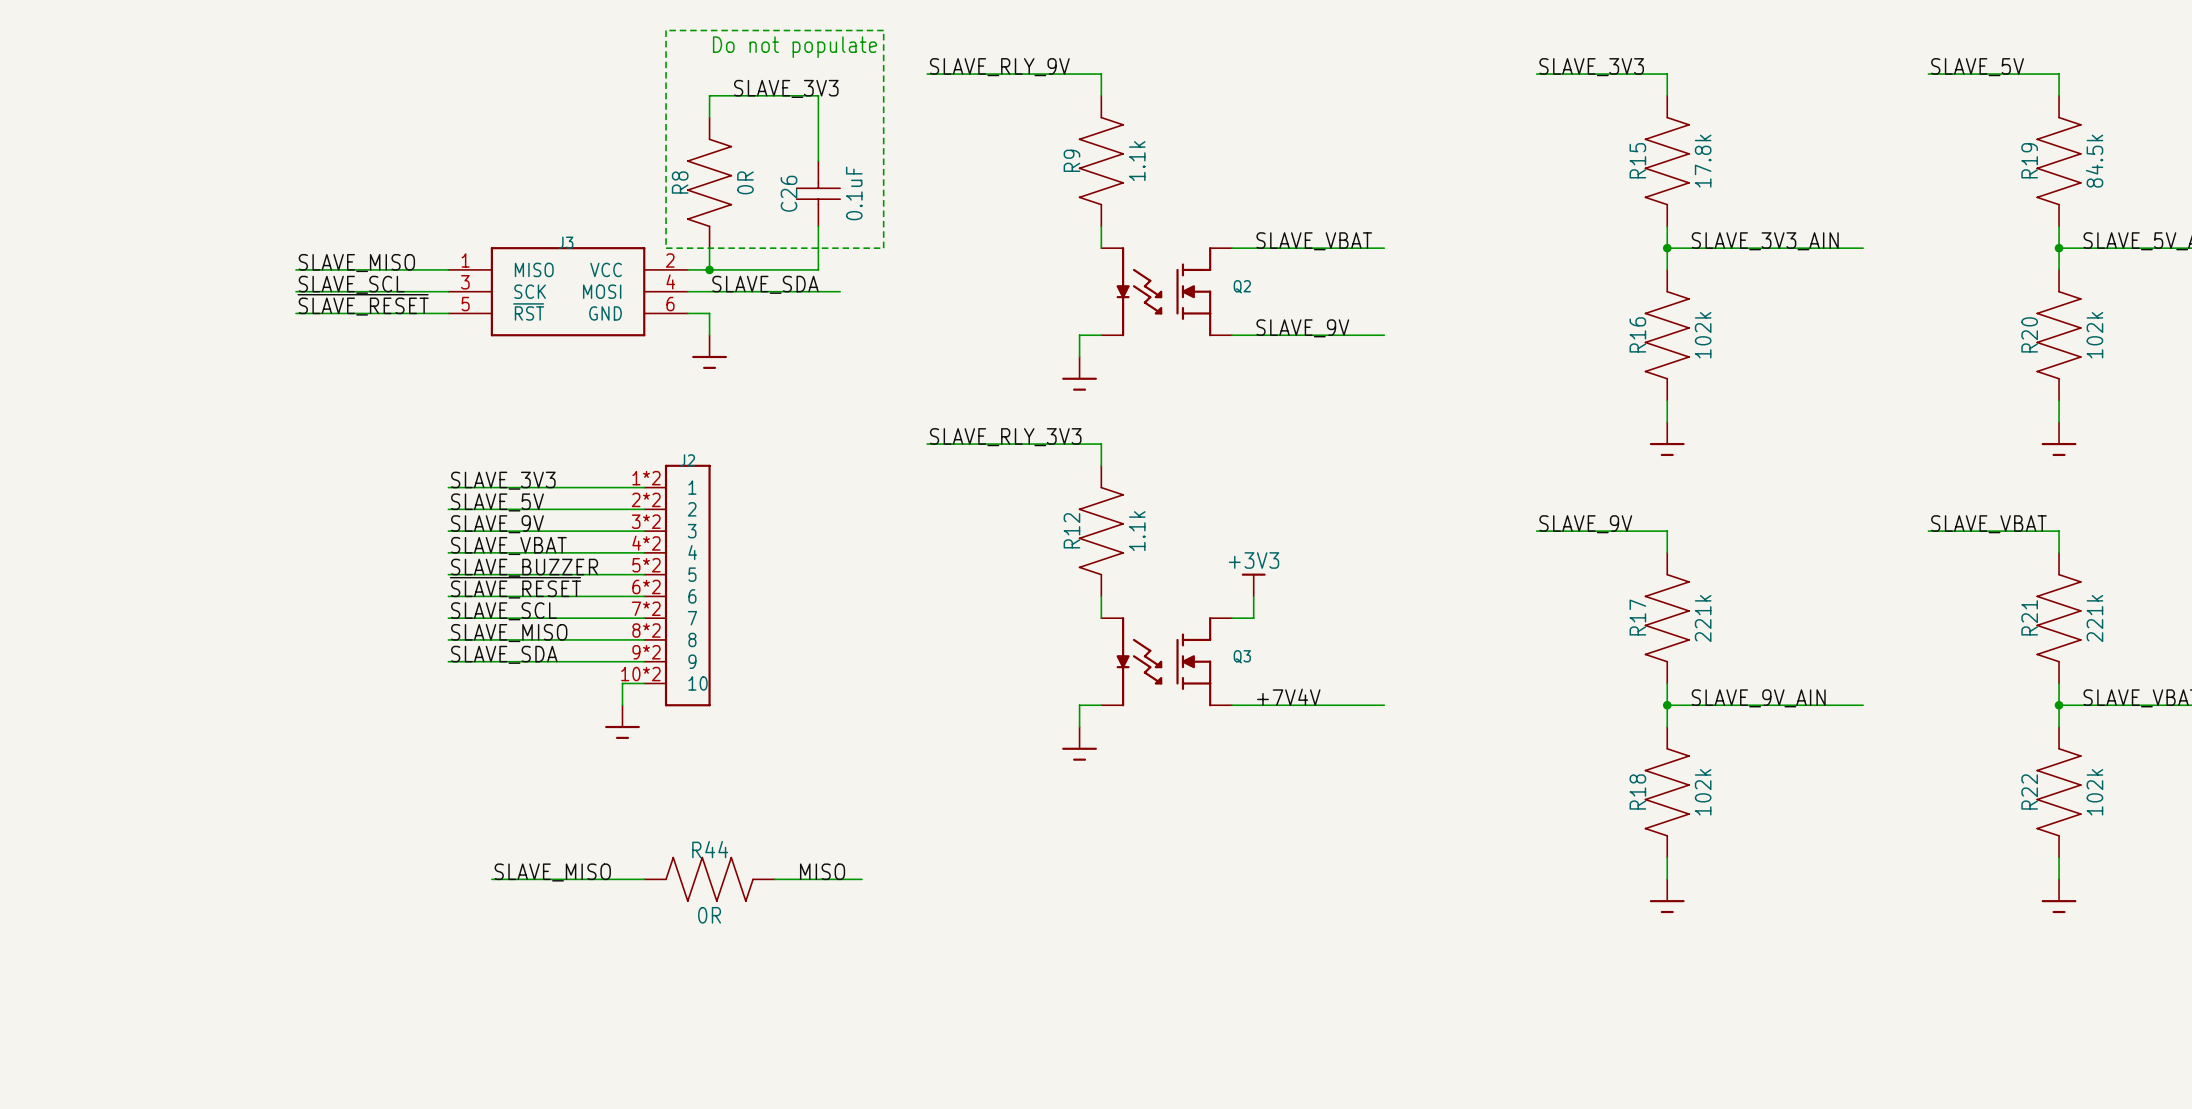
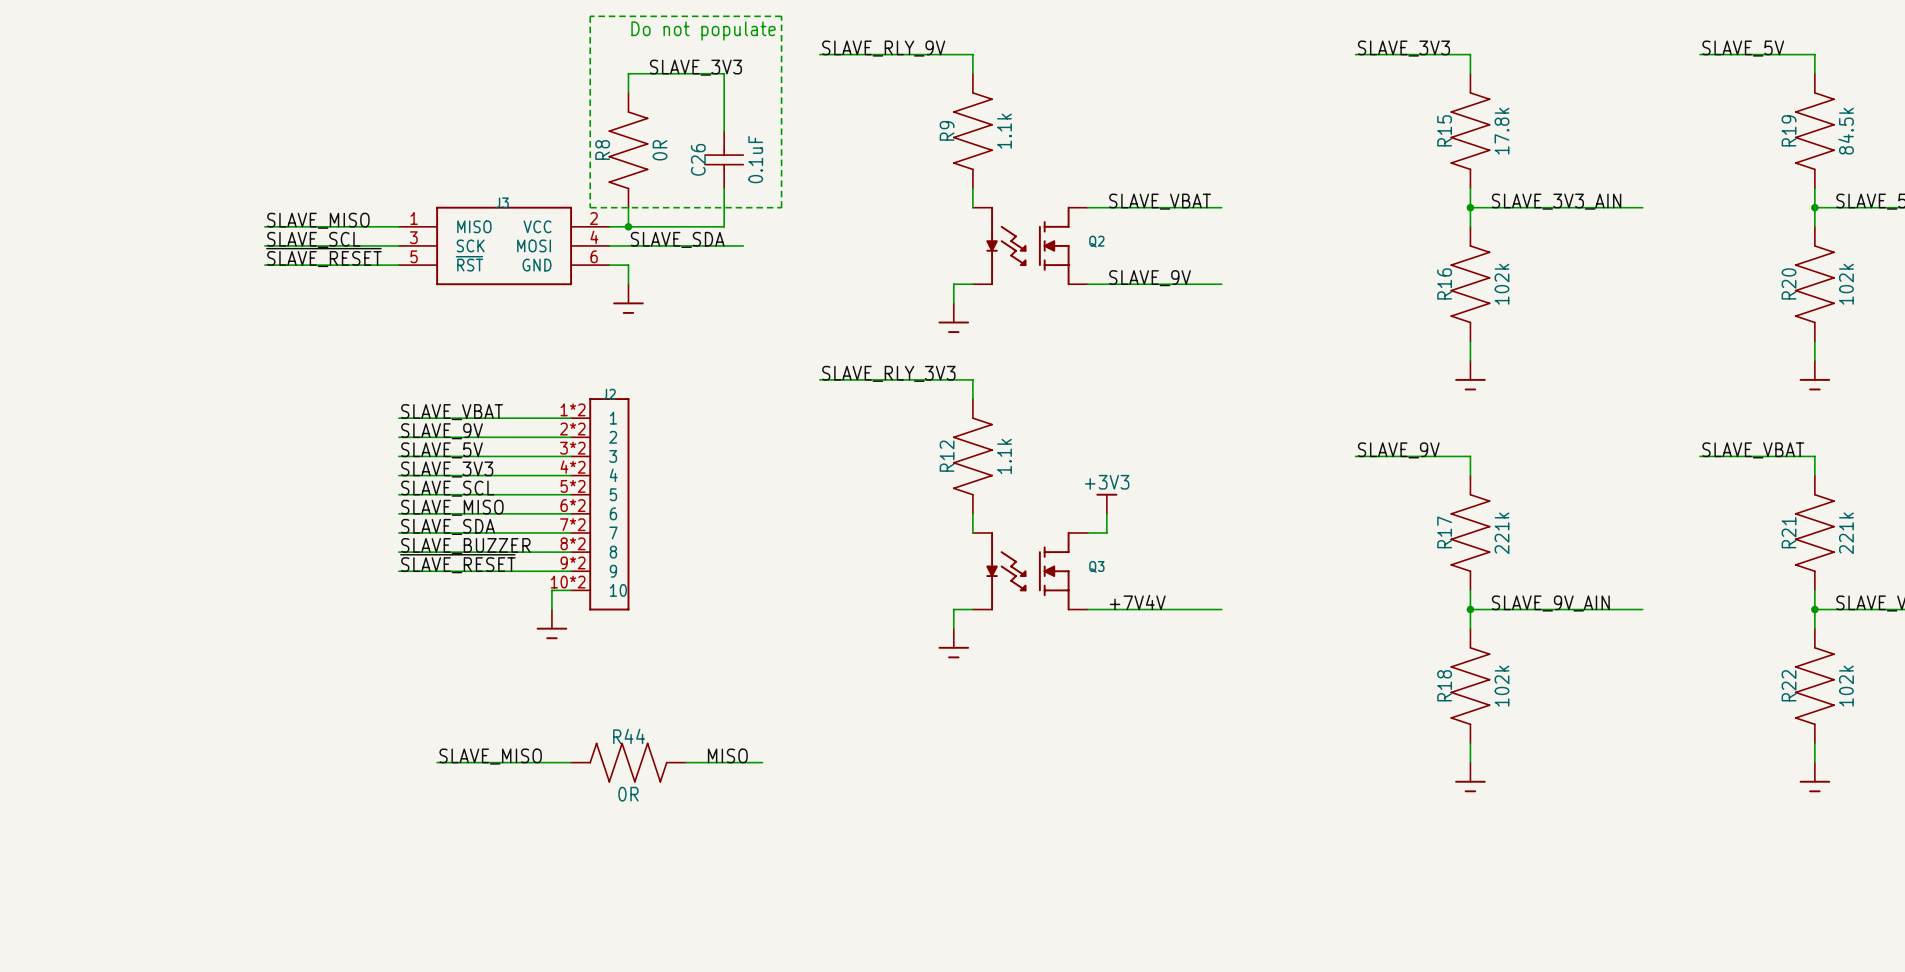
label: SLAVE_3V3 (503, 480) -> SLAVE_VBAT (452, 412)
label: SLAVE_5V (497, 502) -> SLAVE_9V (442, 431)
label: SLAVE_9V (497, 524) -> SLAVE_5V (442, 450)
label: SLAVE_VBAT (508, 545) -> SLAVE_3V3 (447, 469)
label: SLAVE_BUZZER (524, 567) -> SLAVE_SCL (447, 488)
label: ~{SLAVE_RESET} (515, 587) -> SLAVE_MISO (452, 507)
label: SLAVE_SCL (504, 611) -> SLAVE_SDA (448, 526)
label: SLAVE_MISO (509, 633) -> SLAVE_BUZZER (465, 546)
label: SLAVE_SDA (504, 654) -> ~{SLAVE_RESET} (457, 563)

